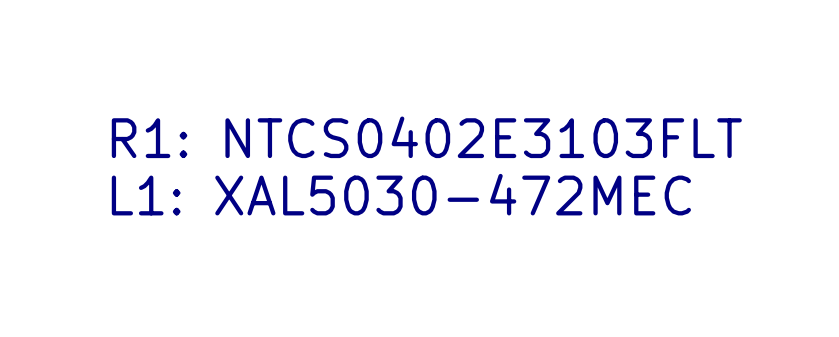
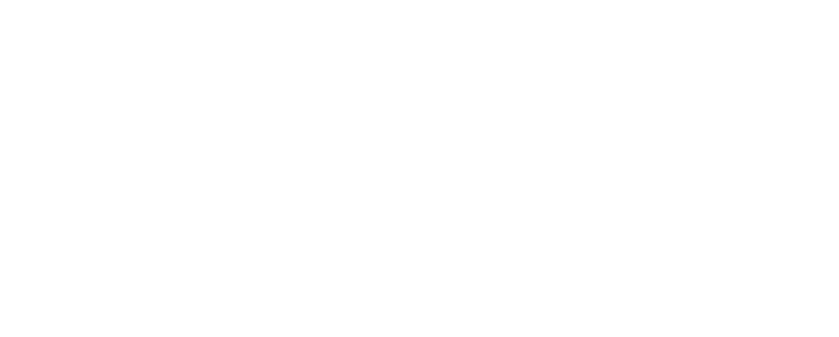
text: R1: NTCS0402E3103FLT (426, 137) -> none
text: L1: XAL5030-472MEC (401, 194) -> none

